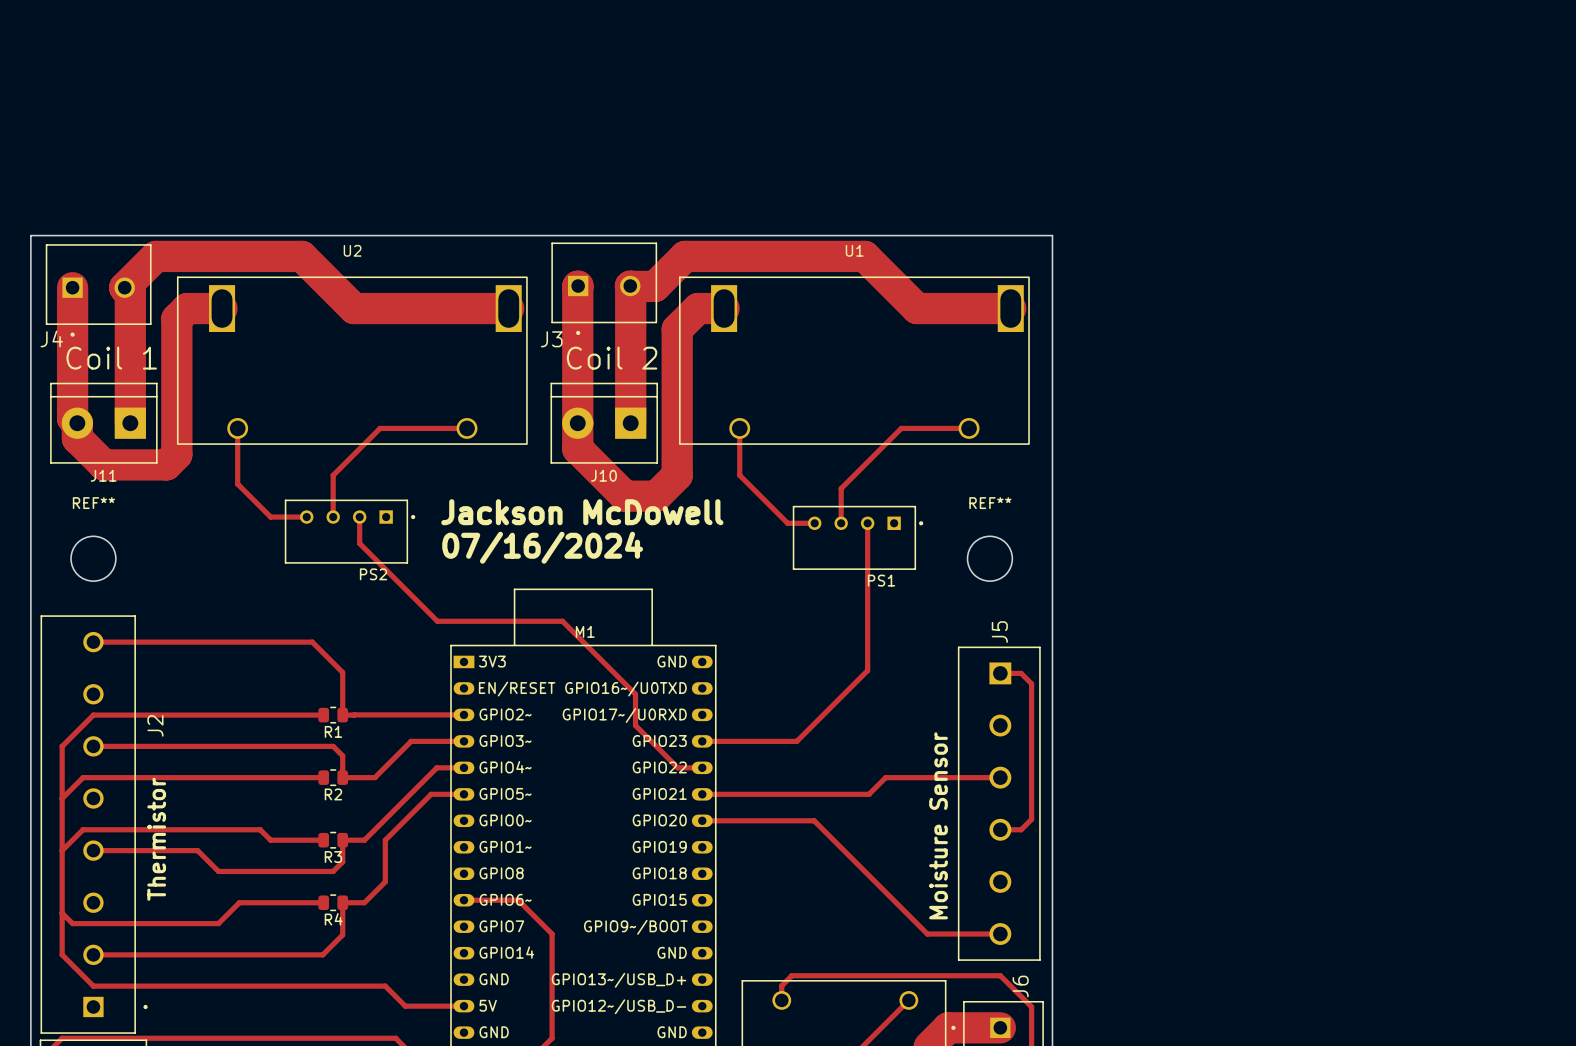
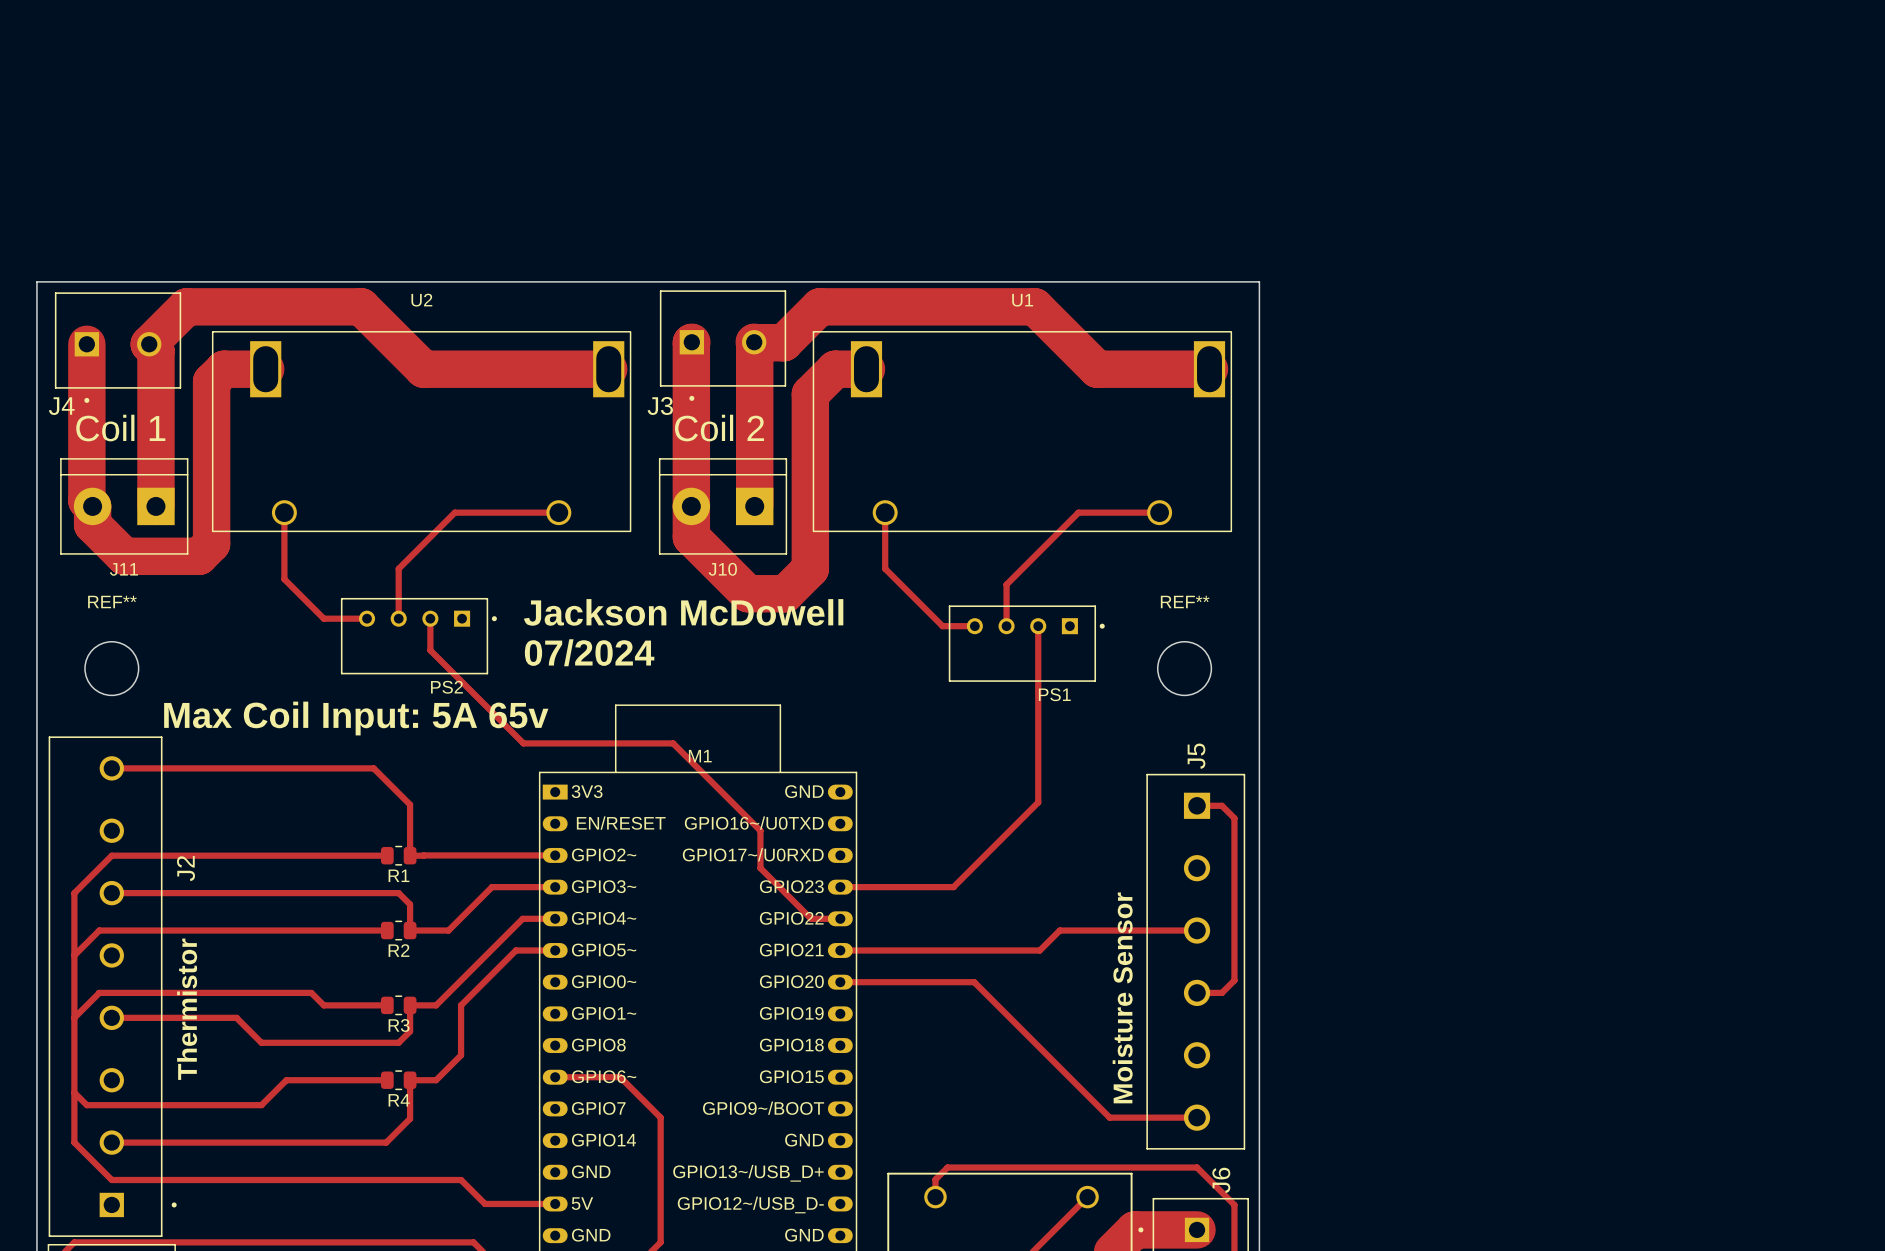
text: 07/16/2024 (542, 547) -> 07/2024 (589, 652)
text: none -> Max Coil Input: 5A 65v (356, 718)

